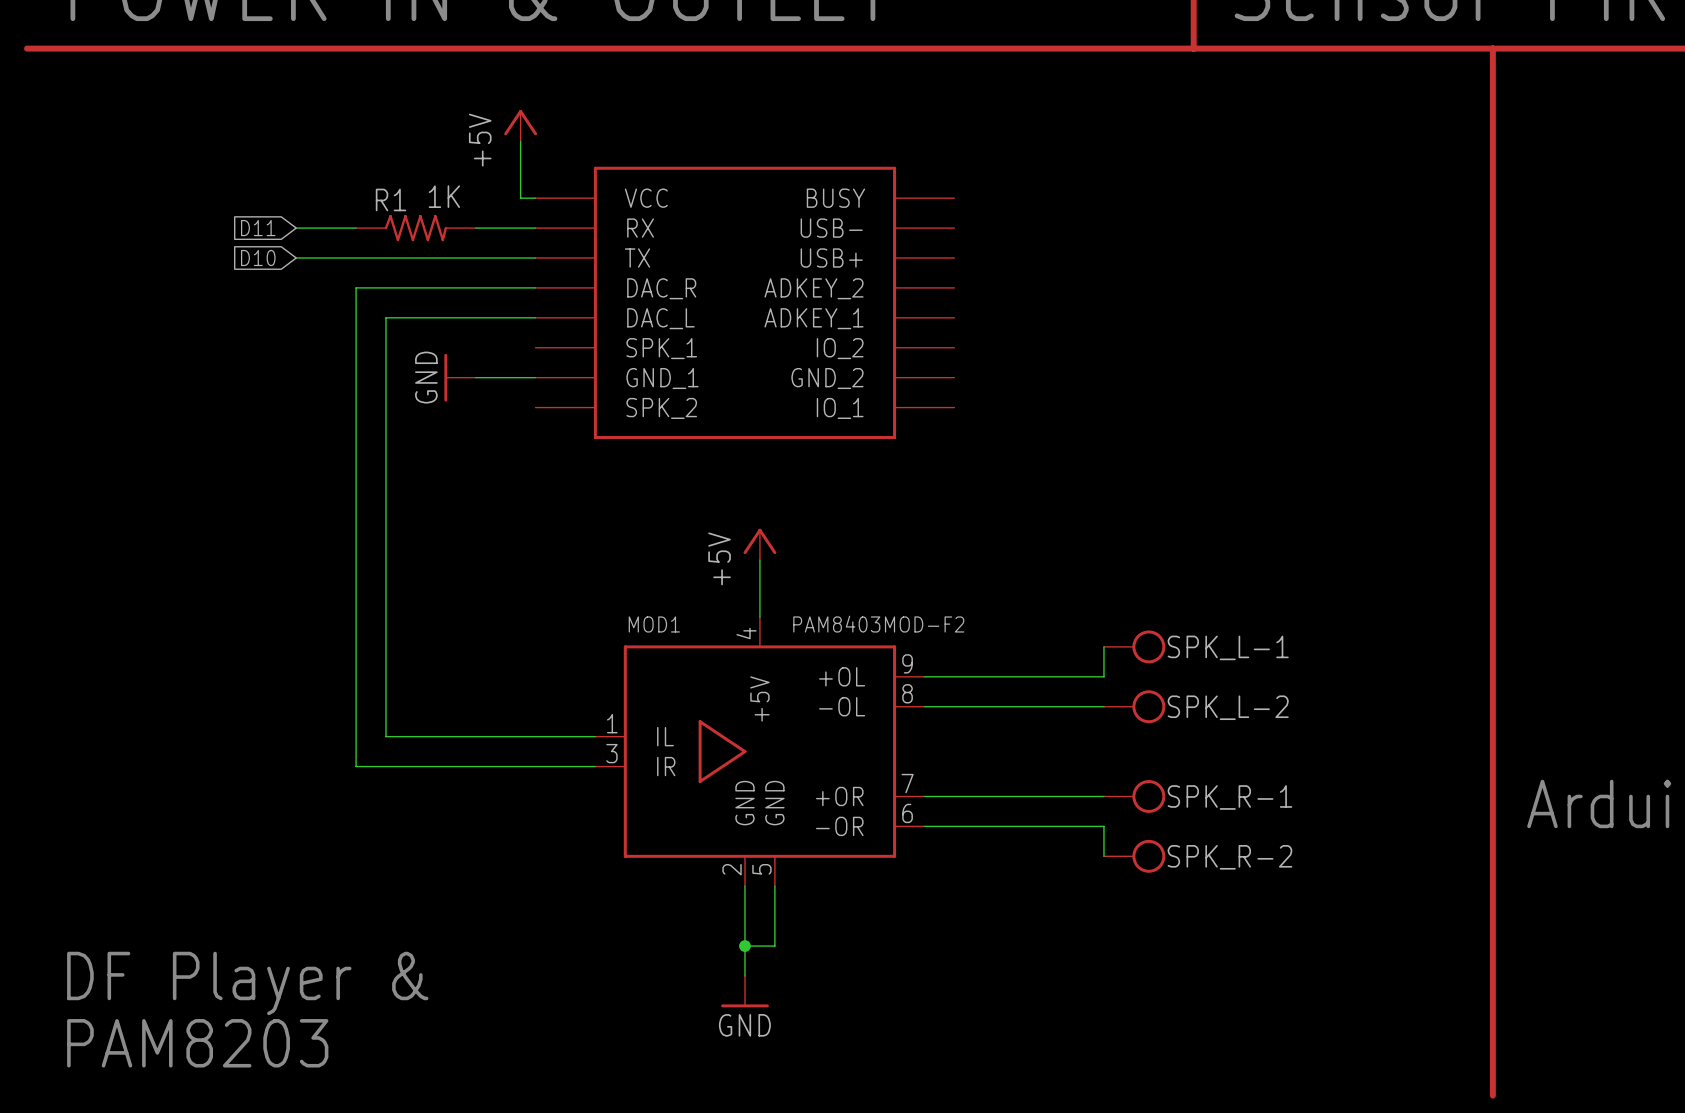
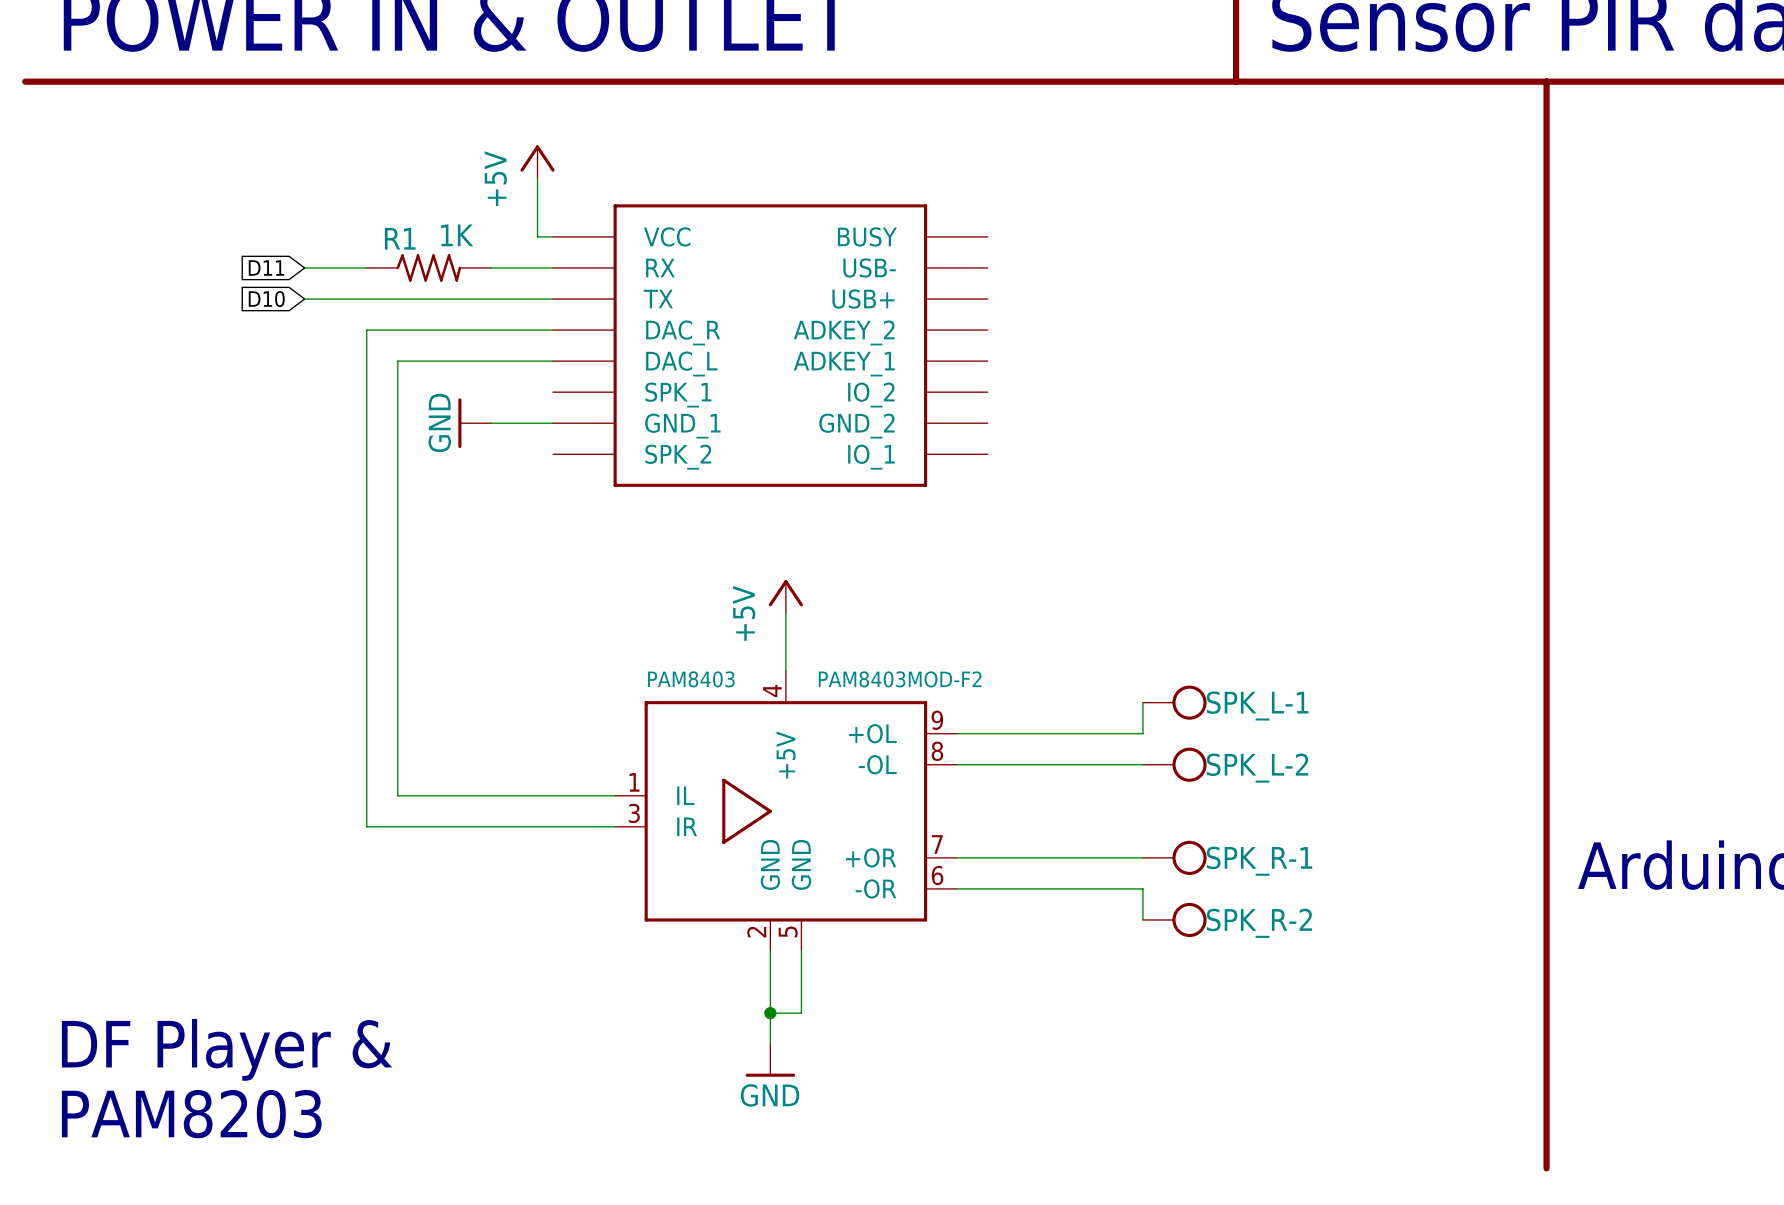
MOD1 name: MOD1 (654, 624) -> PAM8403 (691, 679)

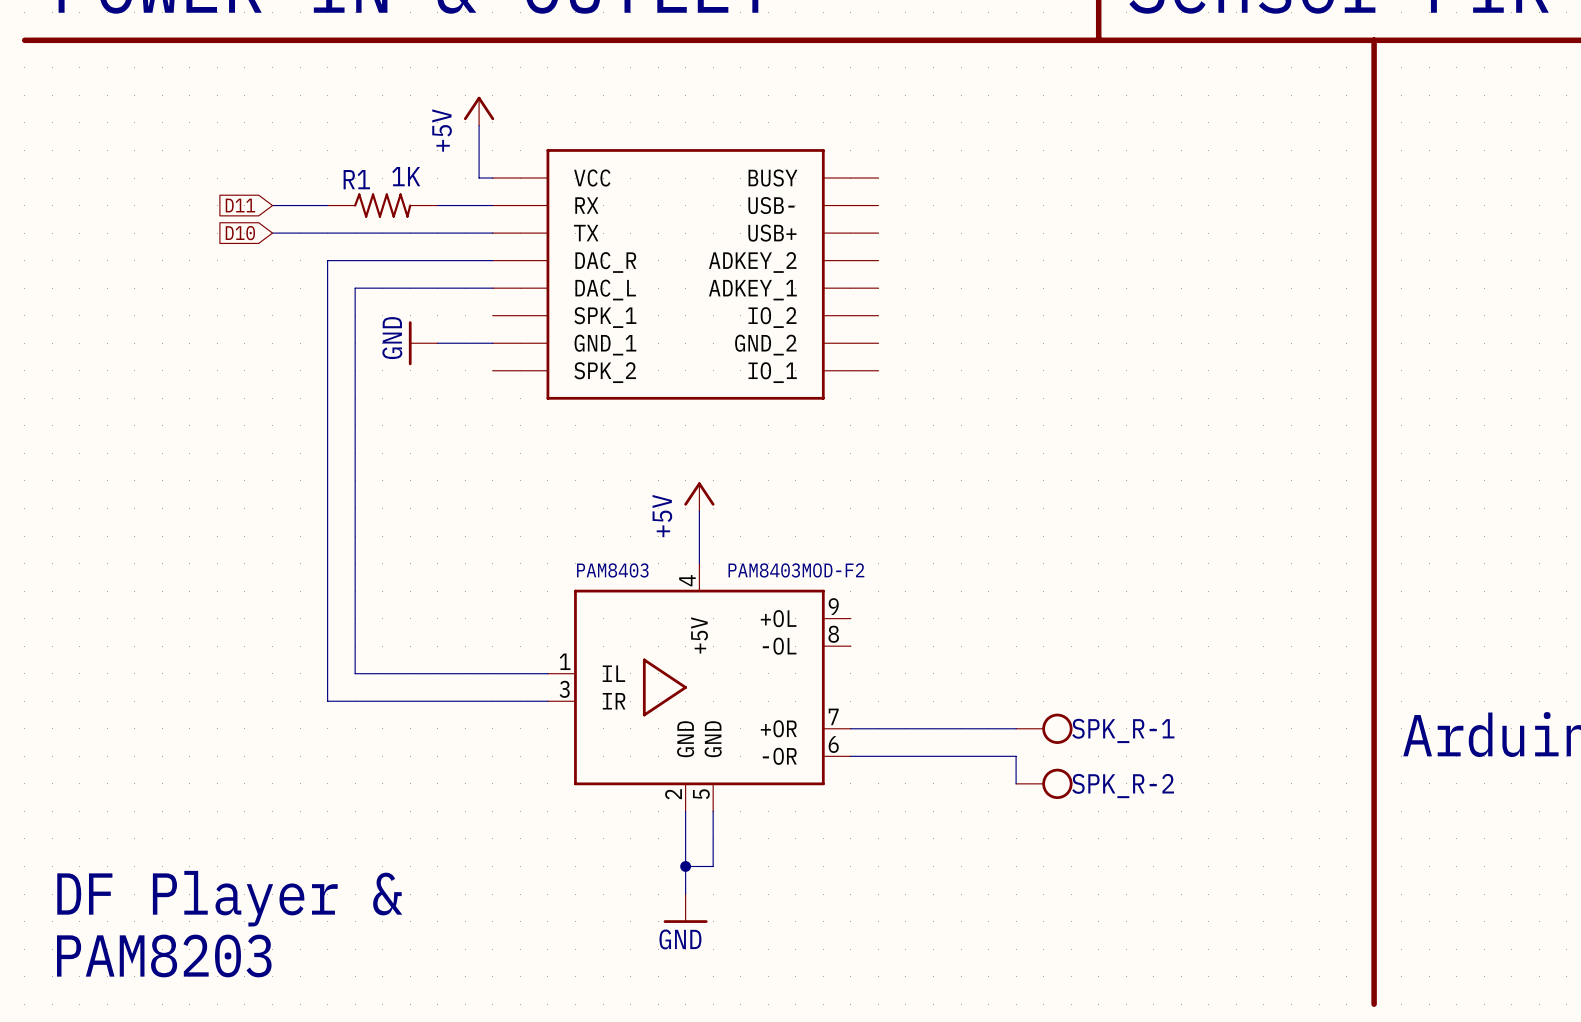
wire: (1142, 702) (1142, 733) (956, 733) -> none
SPK_L-1: (1174, 702) -> none
wire: (956, 764) (1142, 764) -> none
SPK_L-2: (1174, 764) -> none

